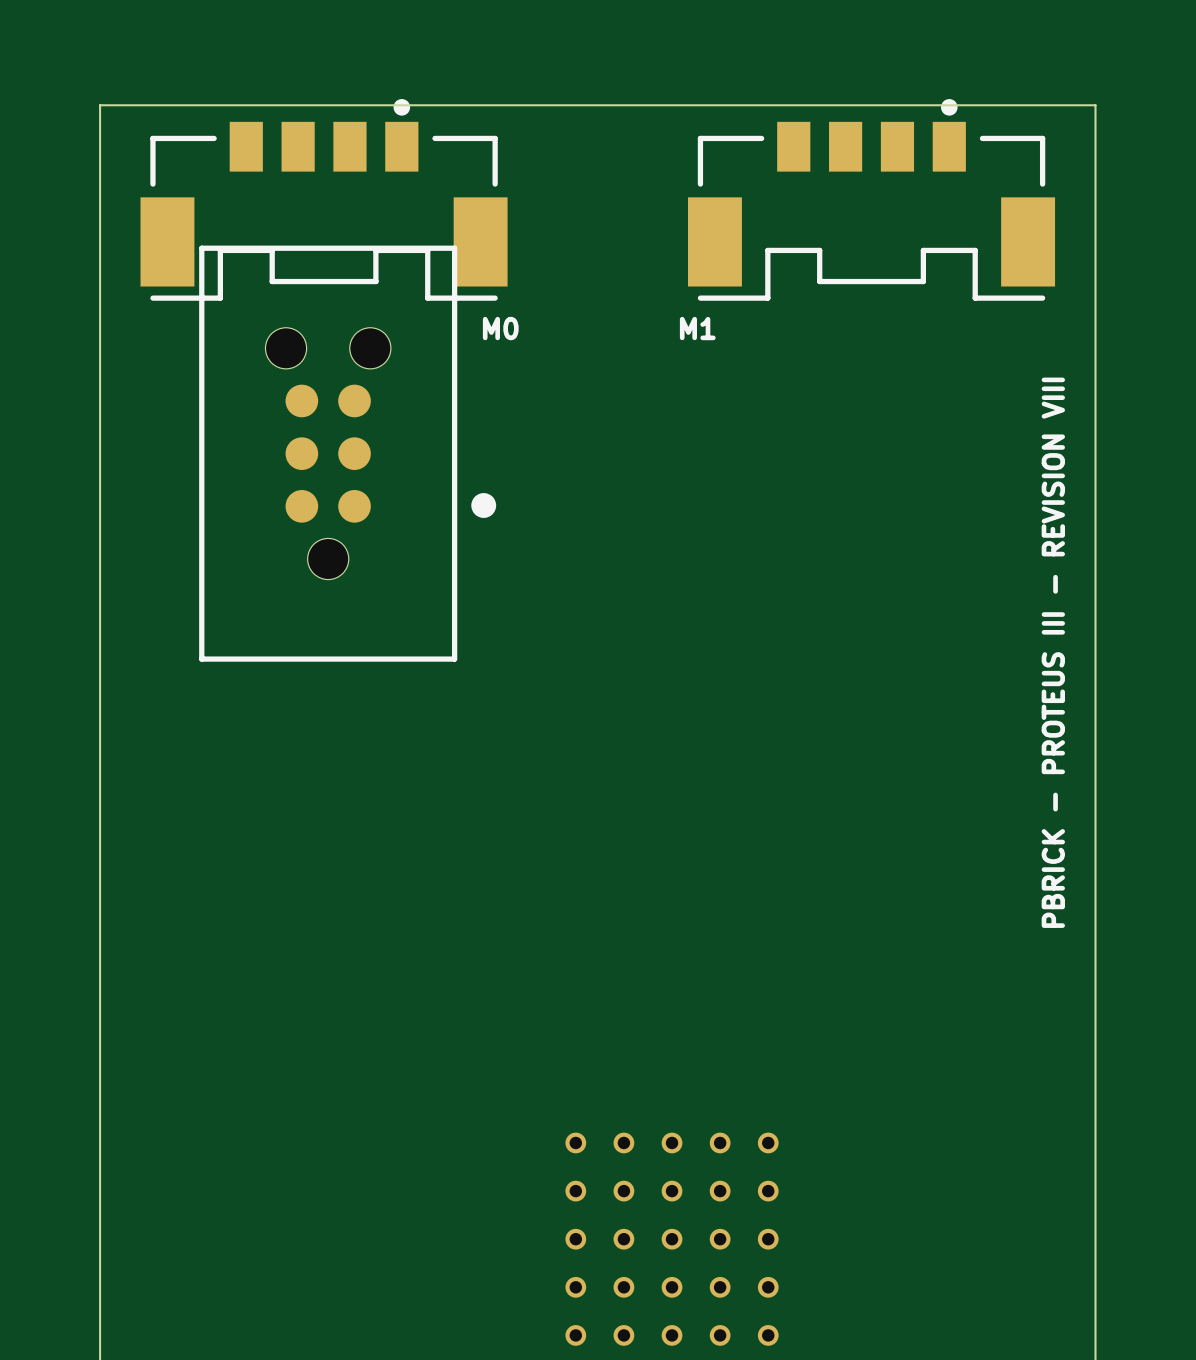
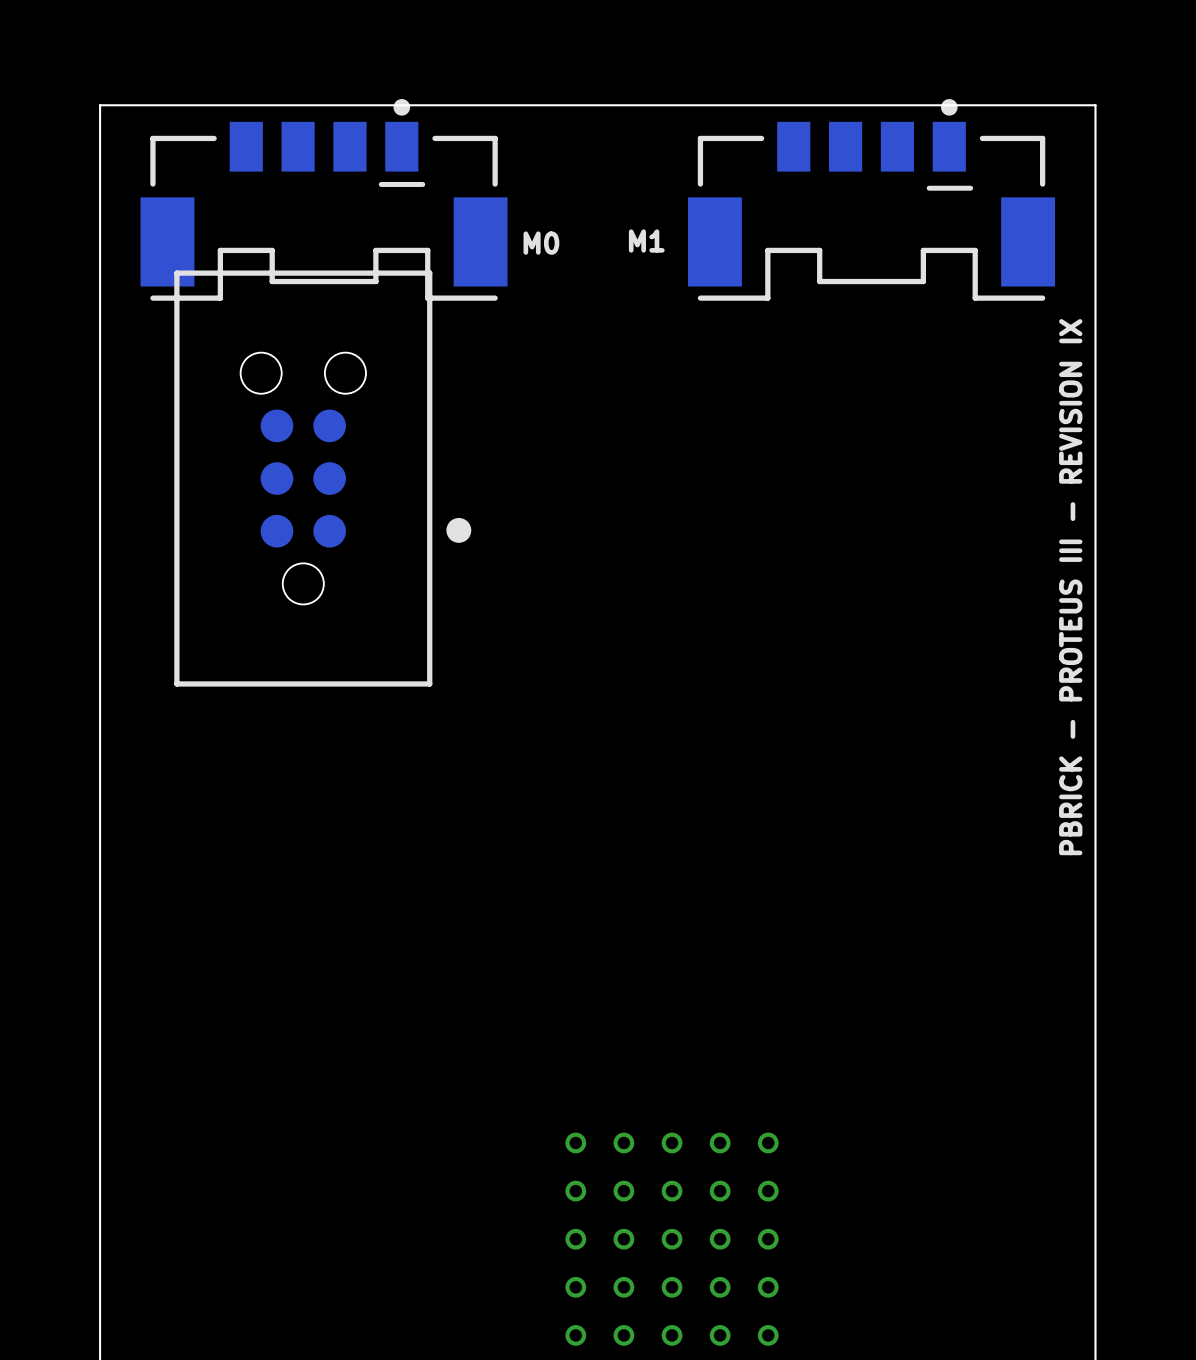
line: none -> (422, 184) (381, 184)
line: none -> (970, 188) (929, 188)
M0 name position: M0 (500, 328) -> M0 (541, 243)
M1 name position: M1 (697, 328) -> M1 (646, 241)
part position: (347, 453) -> (322, 478)
text: PBRICK - PROTEUS III - REVISION VIII (1053, 652) -> PBRICK - PROTEUS III - REVISION IX (1070, 587)

